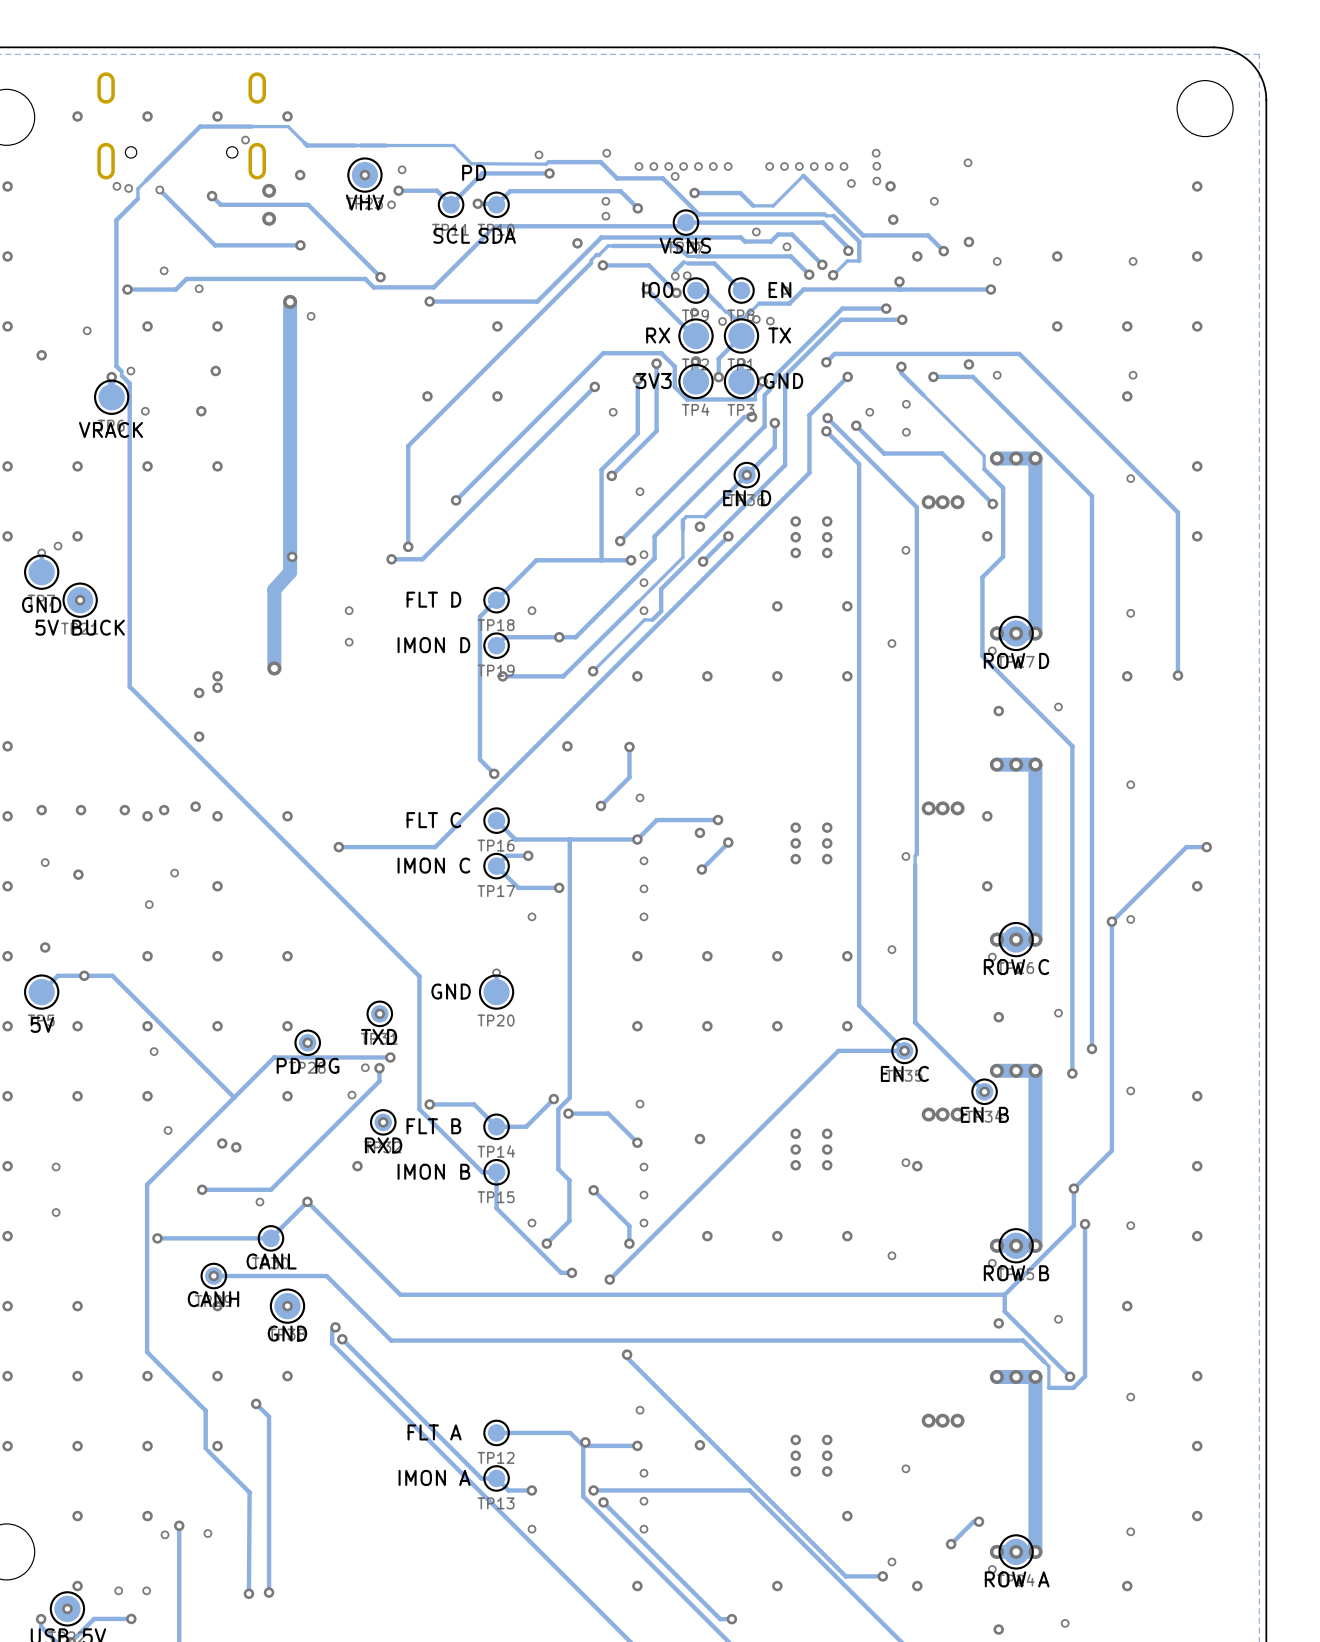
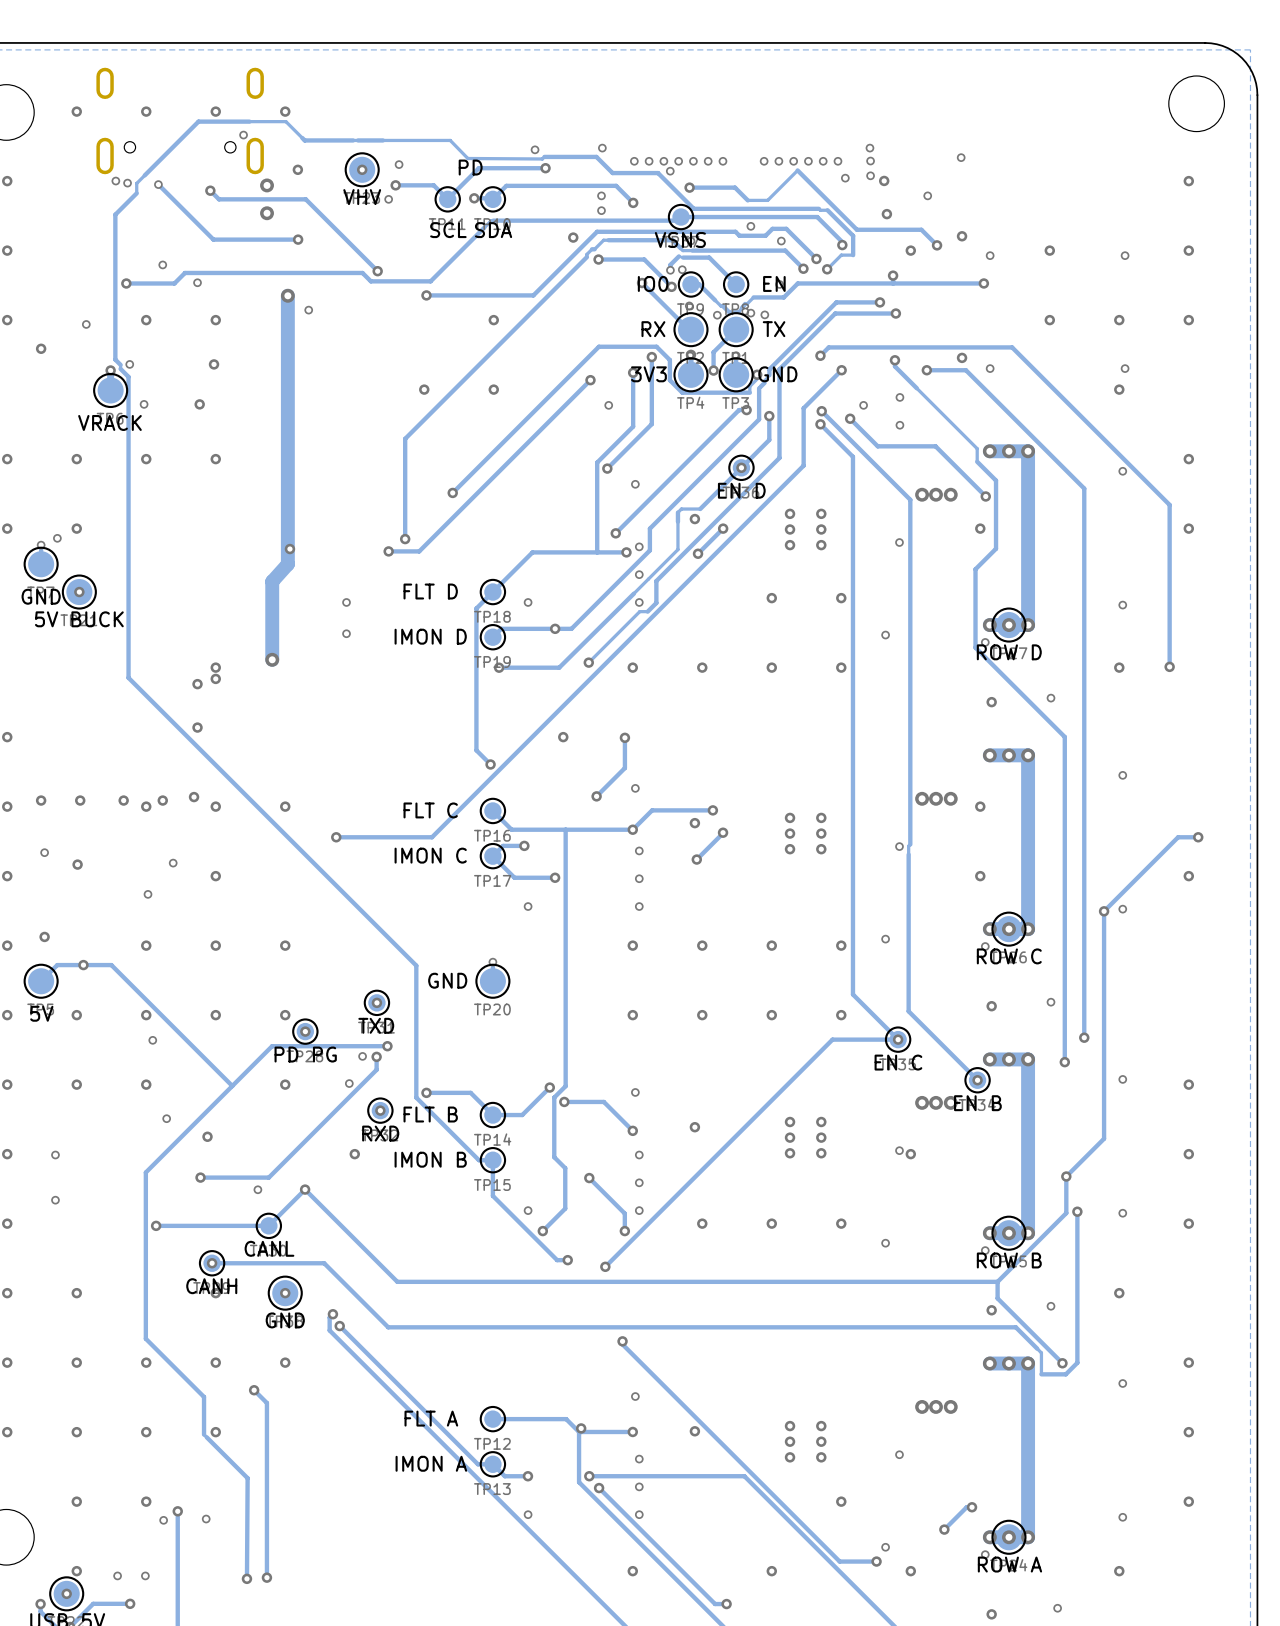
via: (222, 1143) -> none
via: (236, 1147) -> none
via: none -> (207, 1136)

